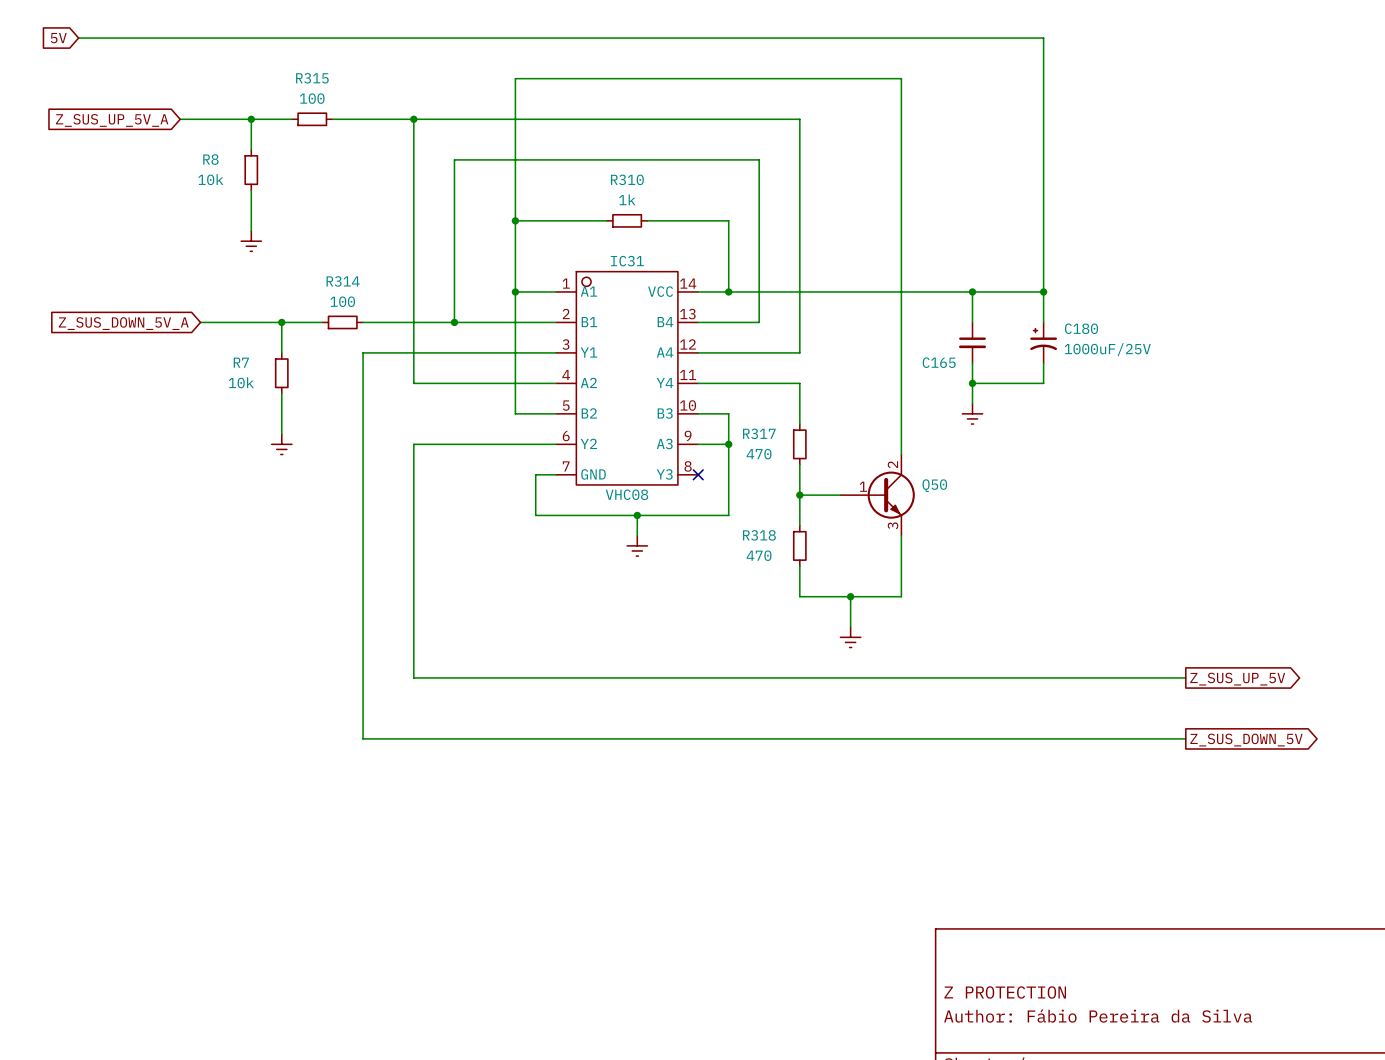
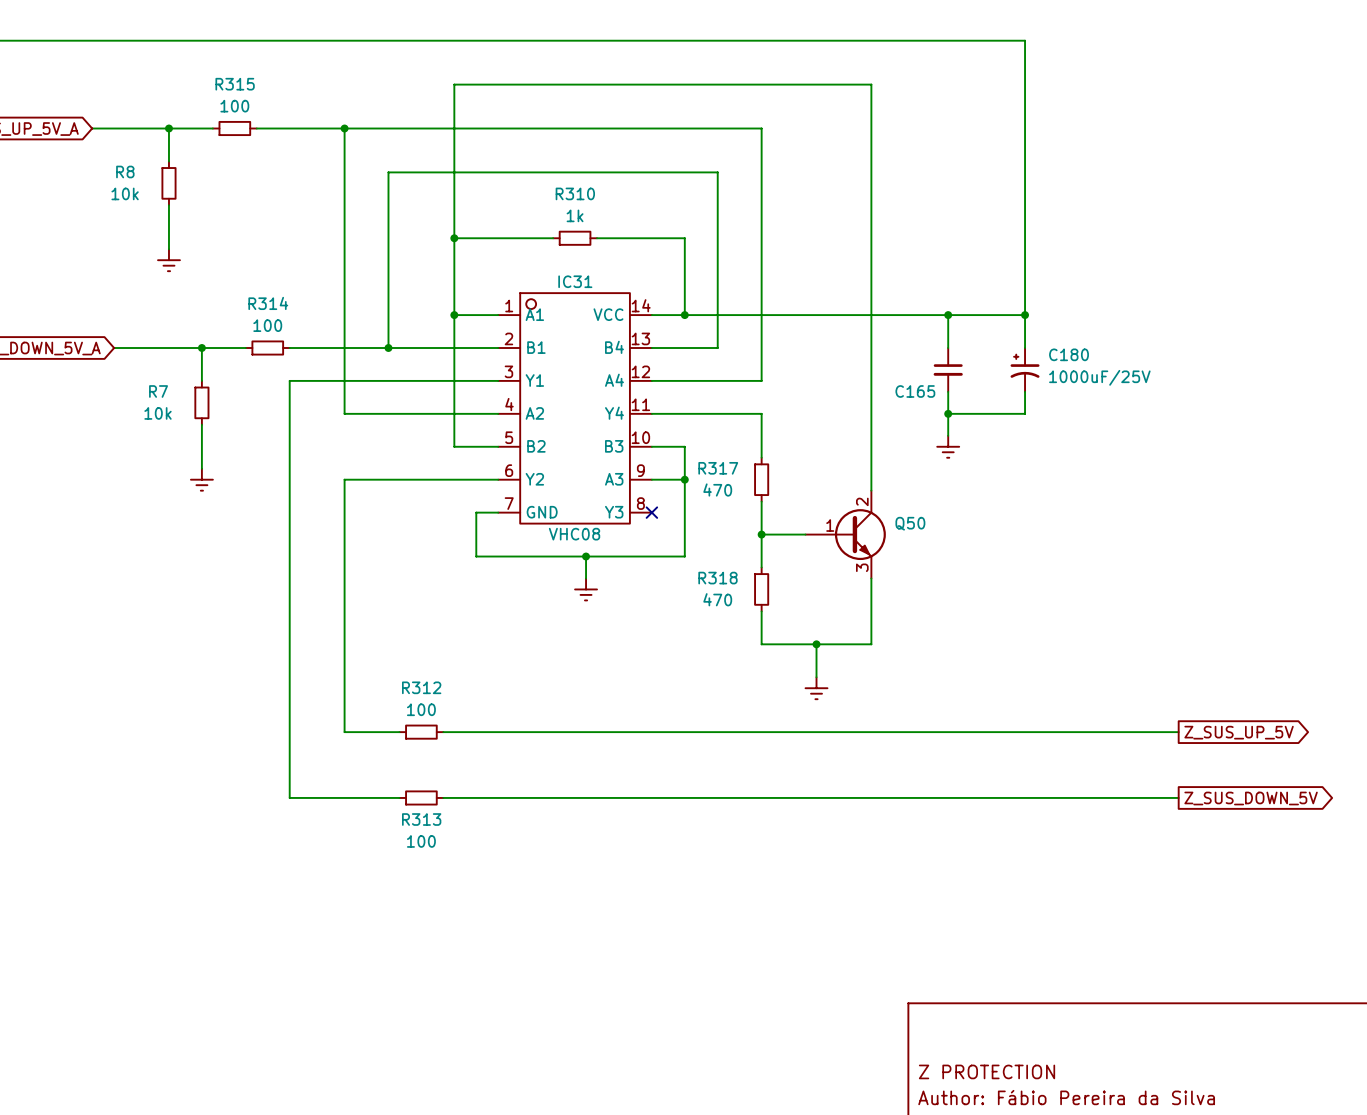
wire: (464, 677) (505, 677) -> none
R312: none -> 100 (421, 732)
wire: (464, 738) (505, 738) -> none
R313: none -> 100 (421, 797)

